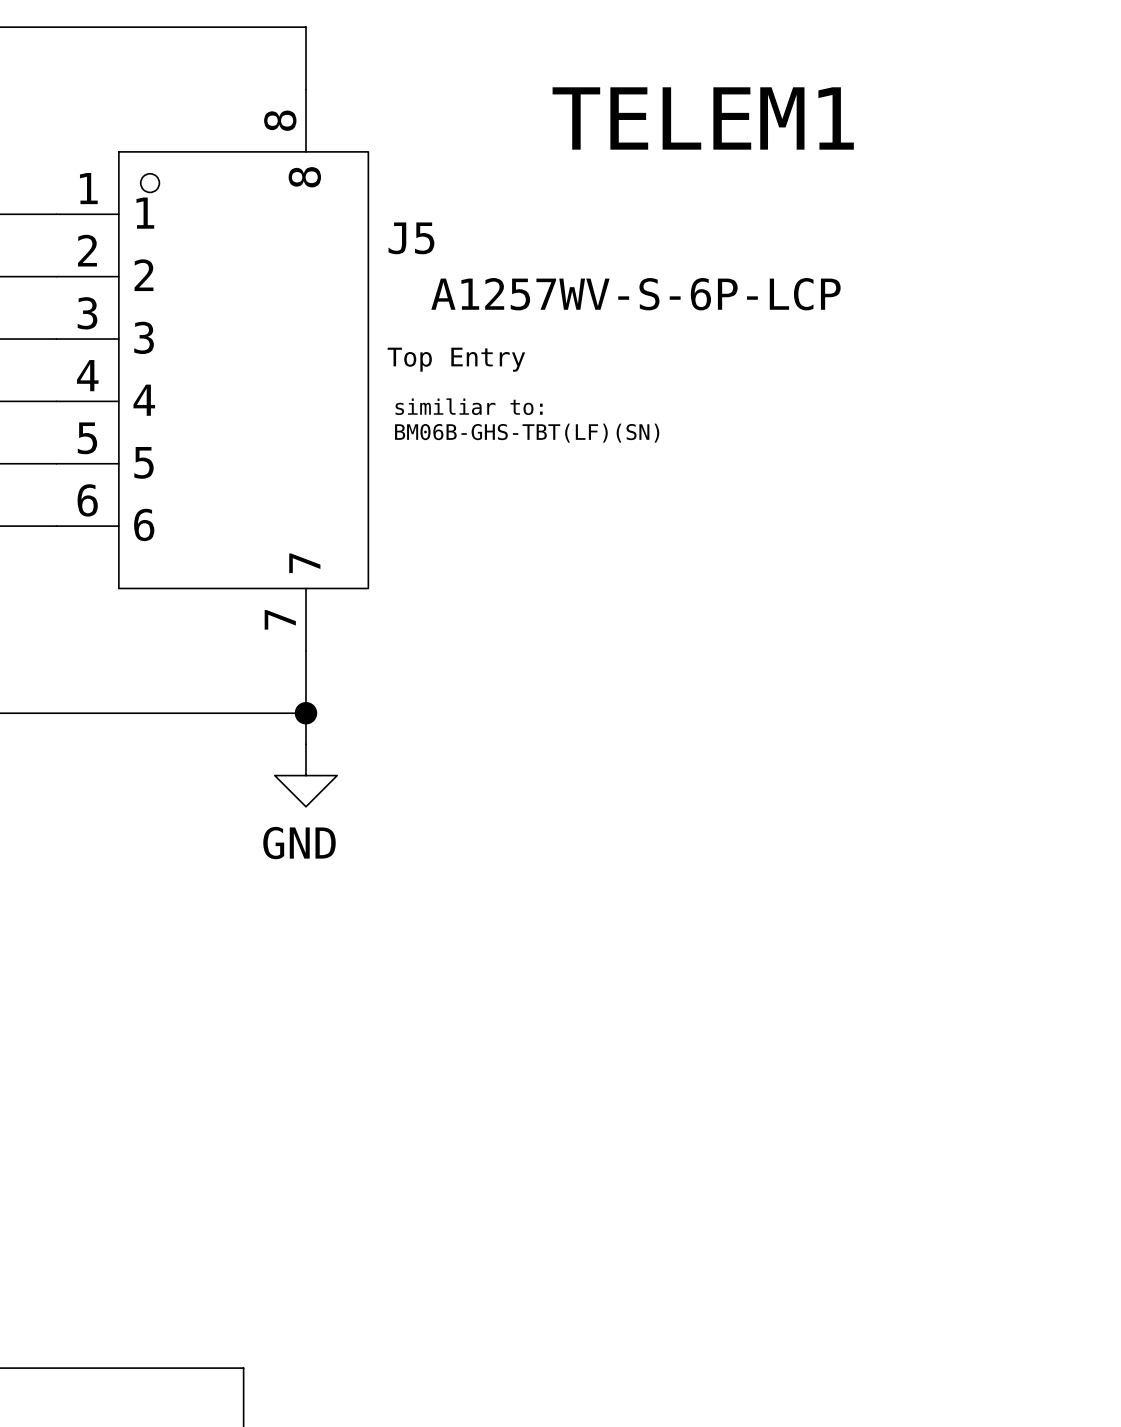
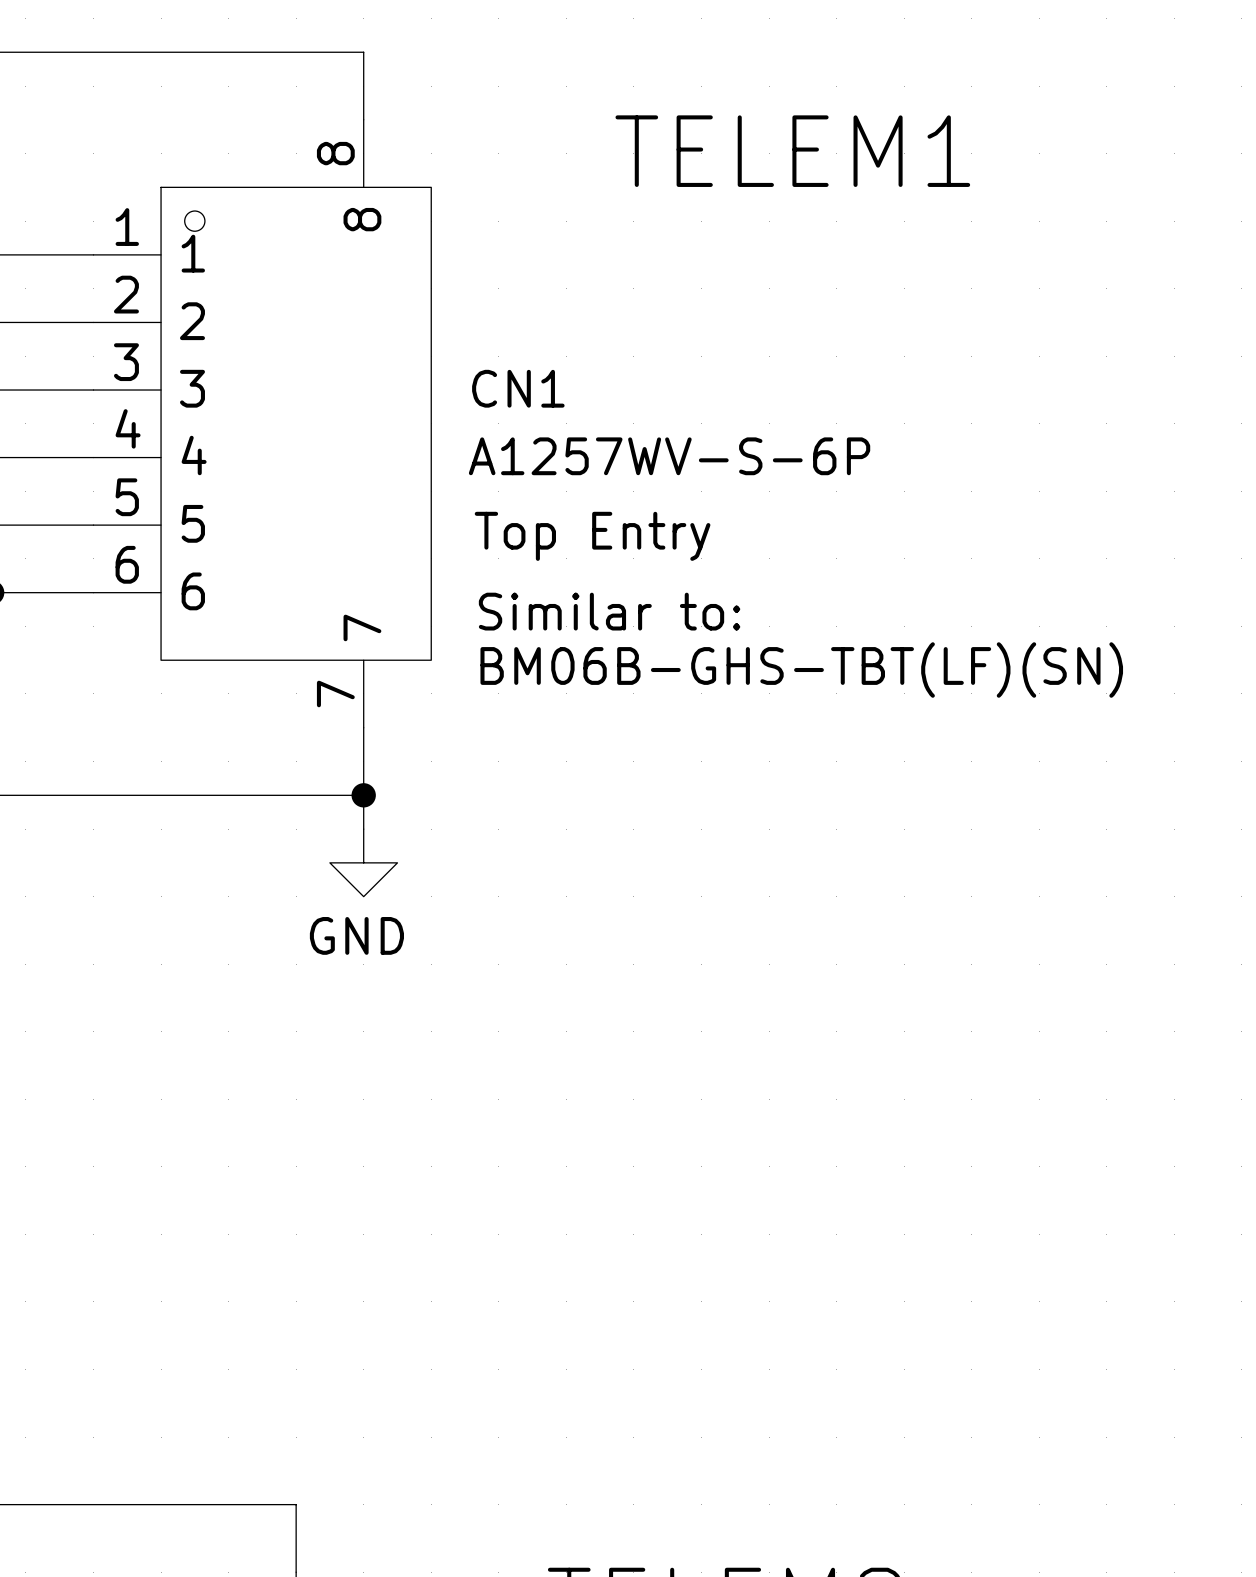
J5 name: J5 (411, 238) -> CN1 (518, 388)
J5 value: A1257WV-S-6P-LCP (635, 294) -> A1257WV-S-6P (669, 456)
J5 text: Top Entry (456, 359) -> none
J5 text: similiar to: (469, 406) -> none
J5 text: BM06B-GHS-TBT(LF)(SN) (527, 433) -> none
text: none -> Top Entry (592, 536)
text: none -> Similar to: (609, 611)
text: none -> BM06B-GHS-TBT(LF)(SN) (801, 670)

